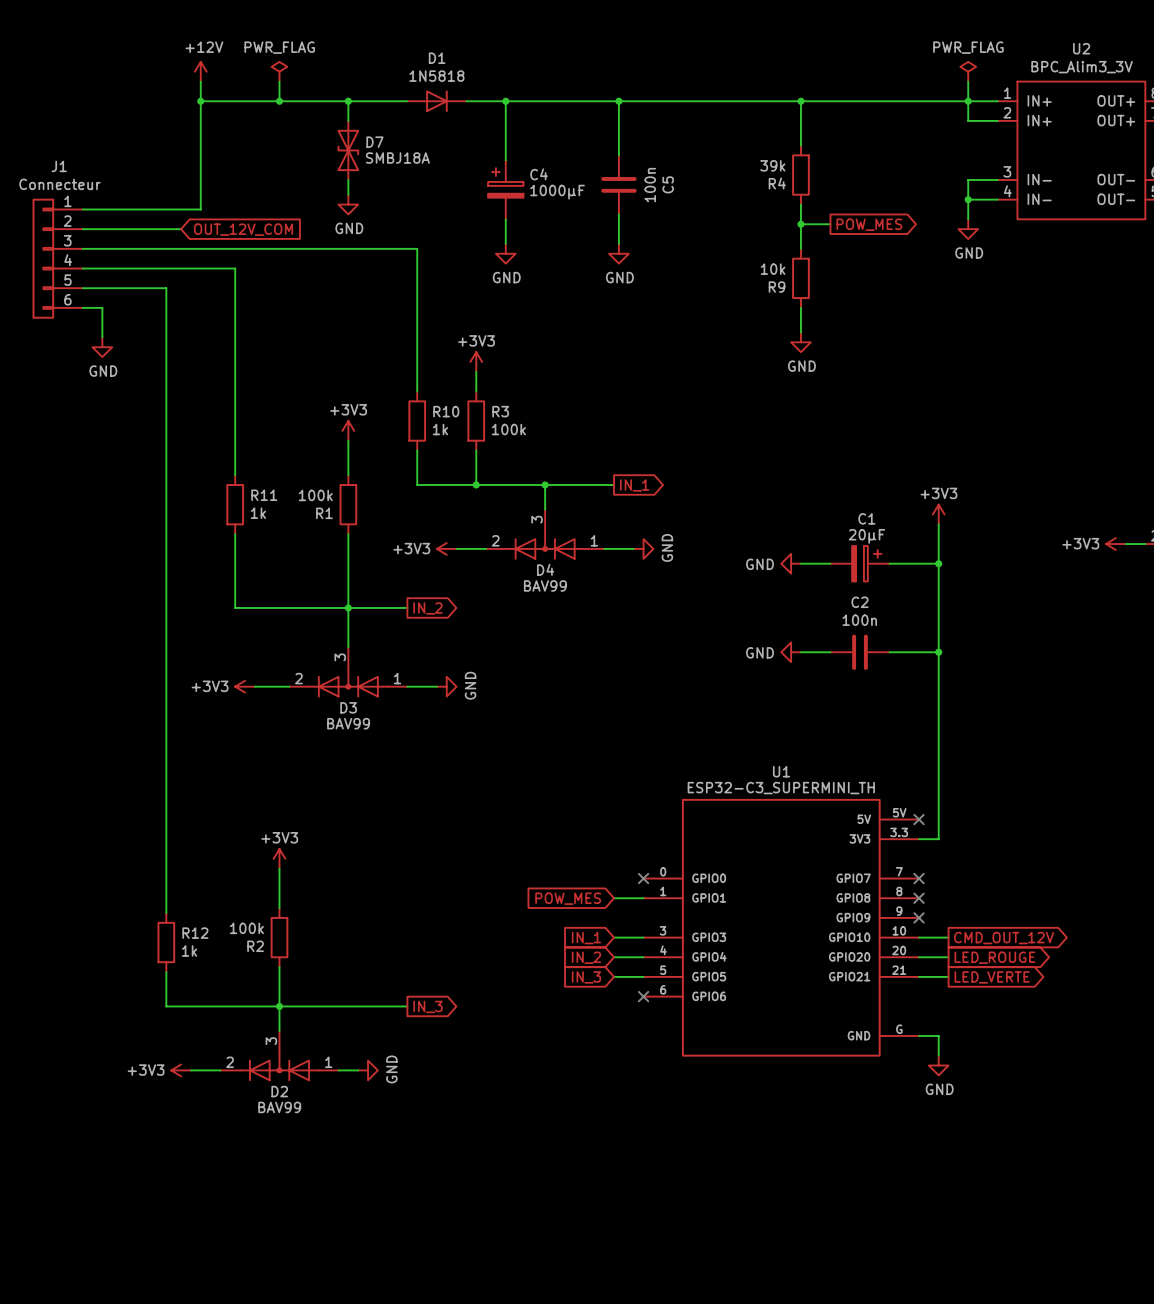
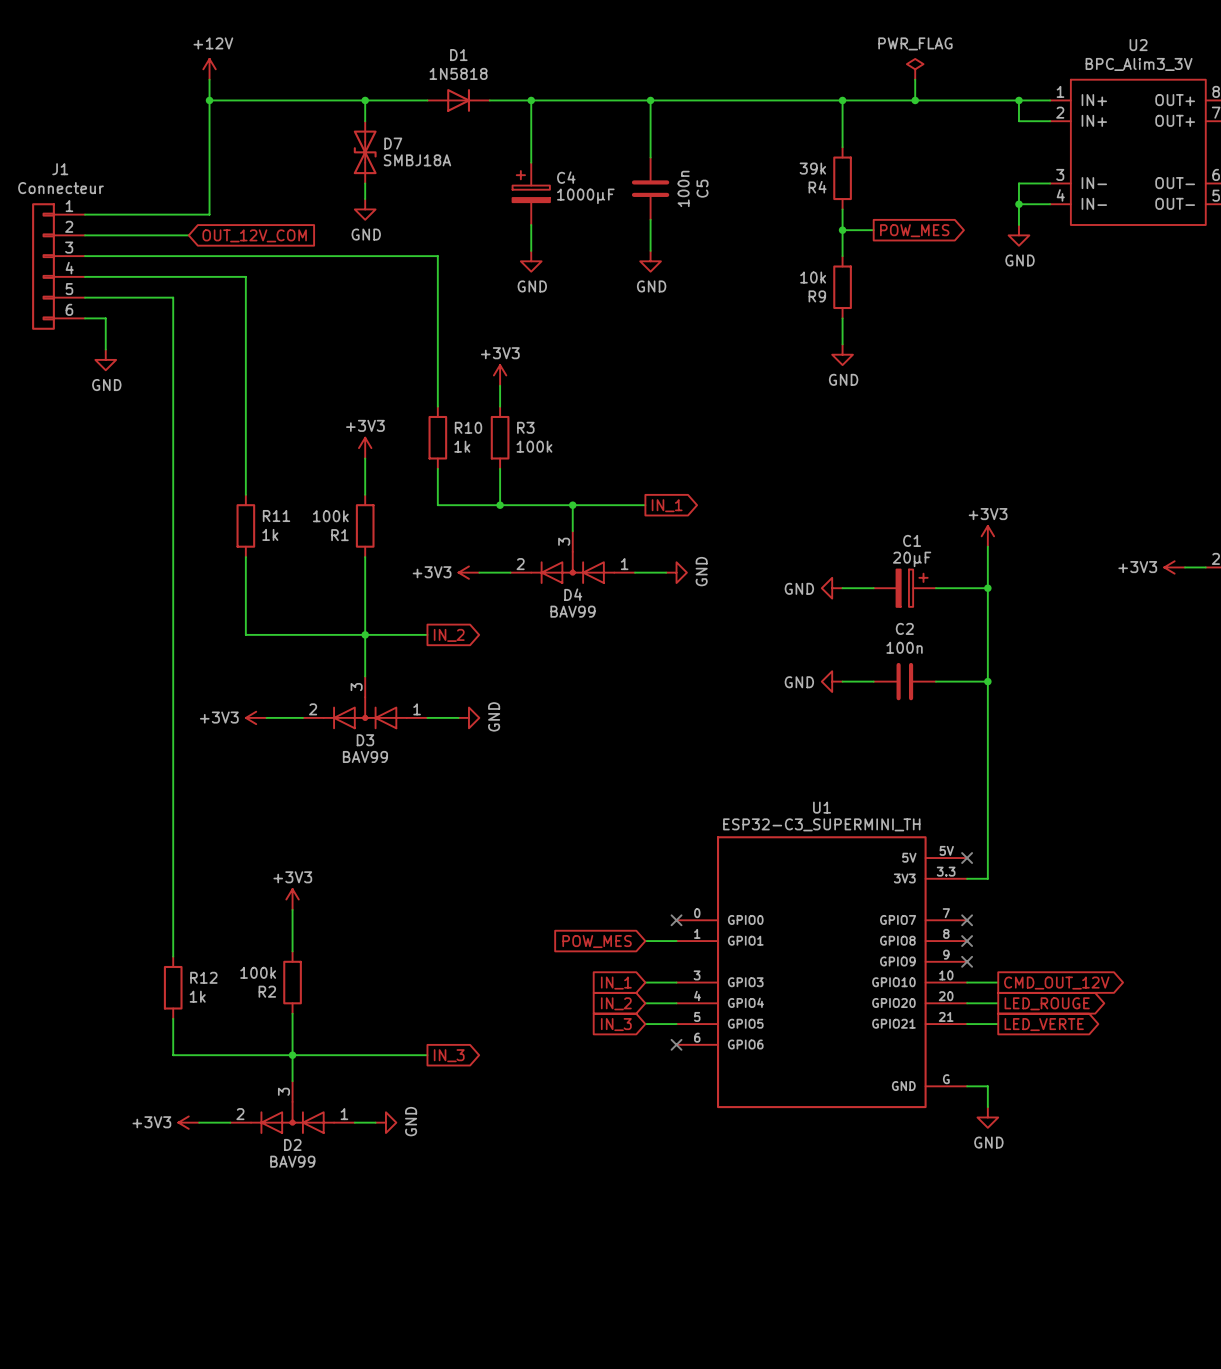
power symbol: PWR_FLAG (279, 71) -> none
power symbol position: PWR_FLAG (968, 71) -> PWR_FLAG (915, 69)
wire: (279, 81) (279, 101) -> none
wire: (968, 81) (968, 101) -> (915, 79) (915, 100)
junction: (279, 101) -> none
junction: none -> (915, 100)

